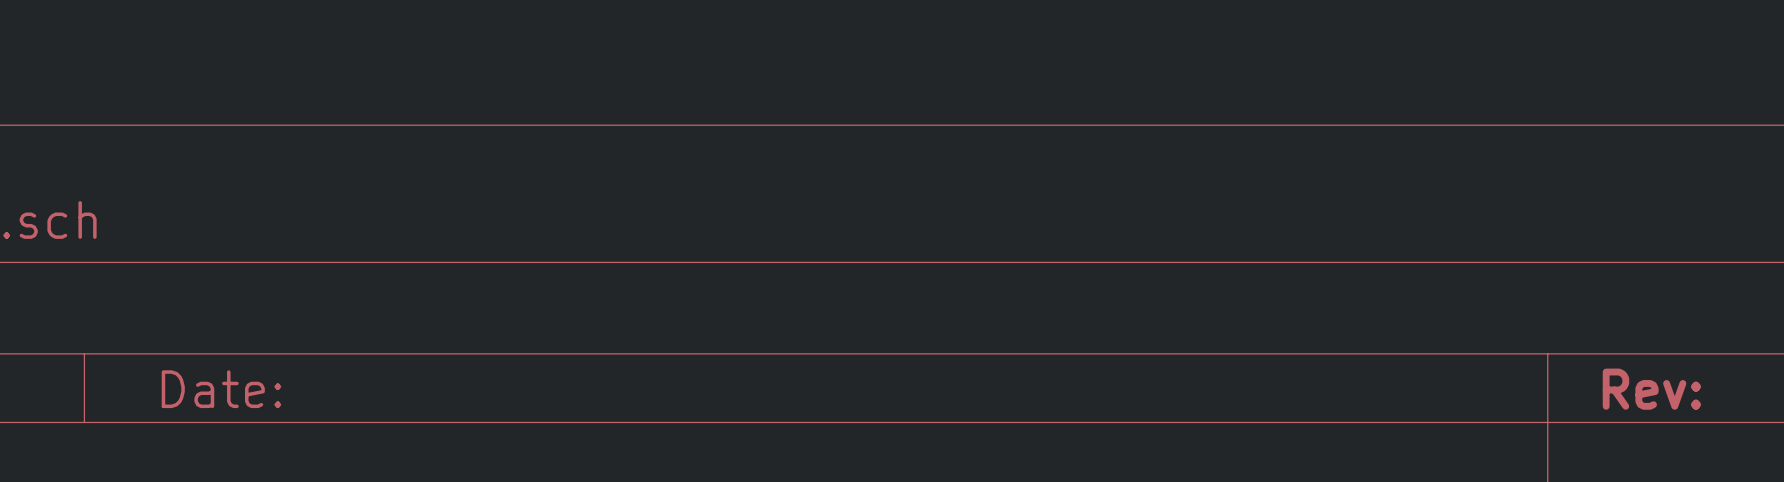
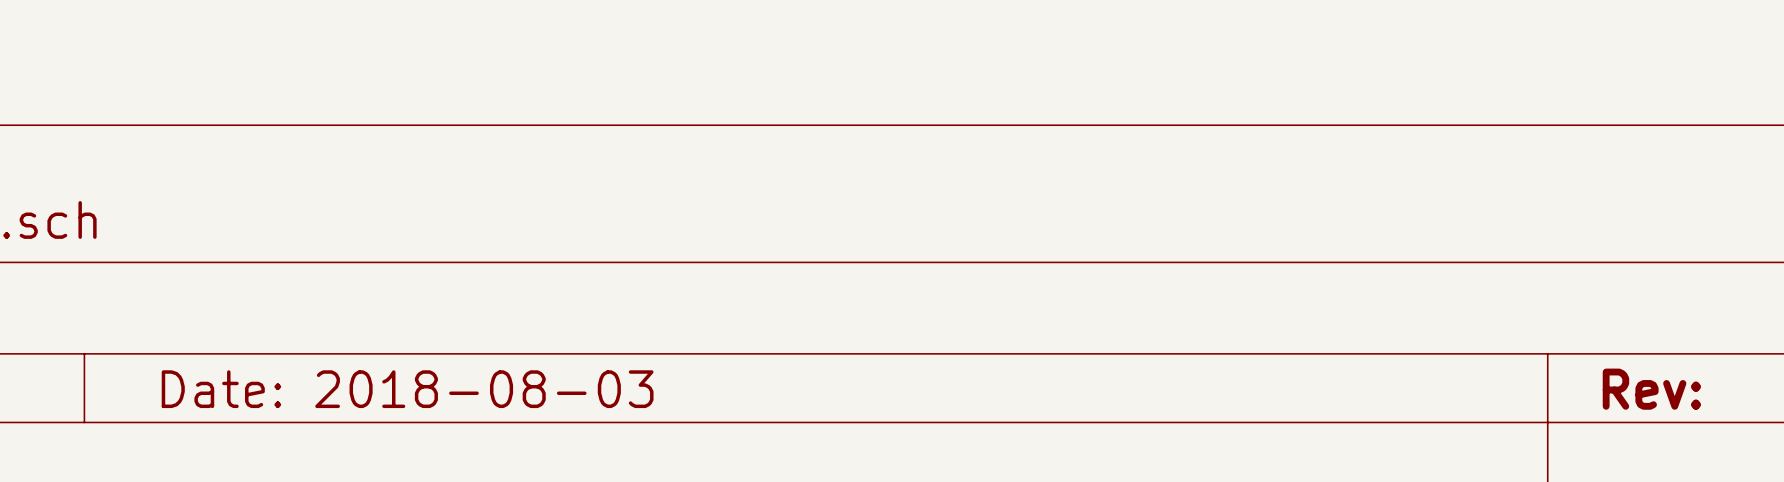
title block: Date: (221, 389) -> Date: 2018-08-03 (407, 389)

